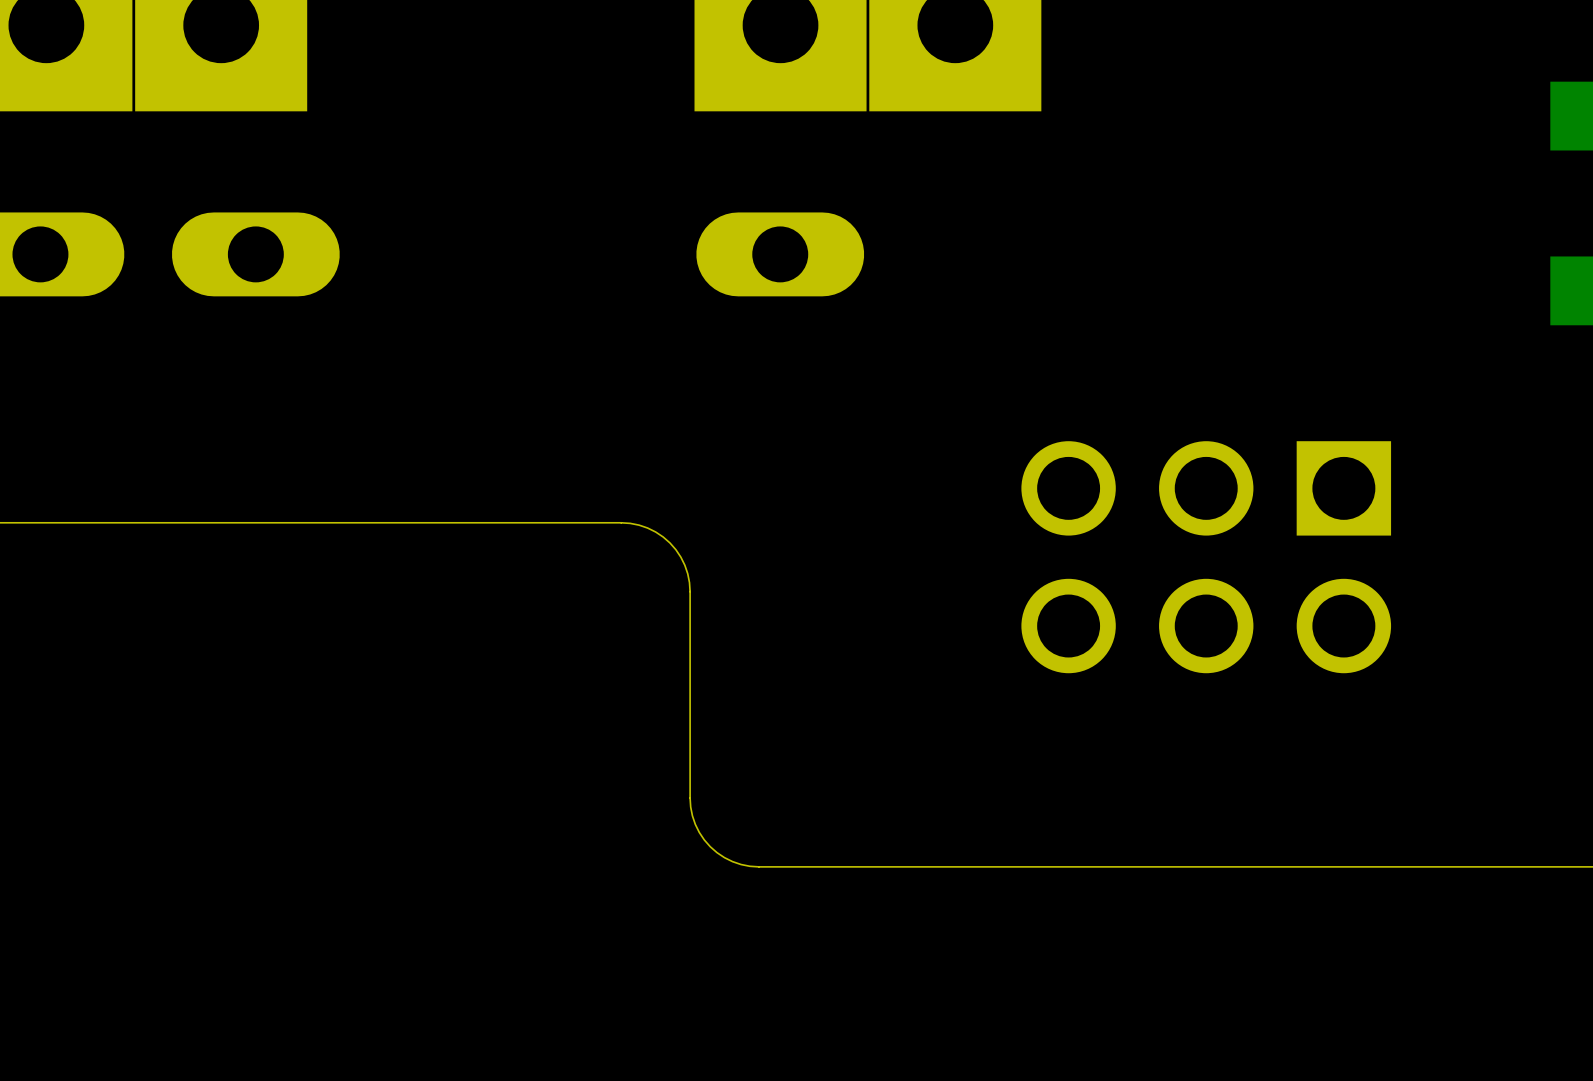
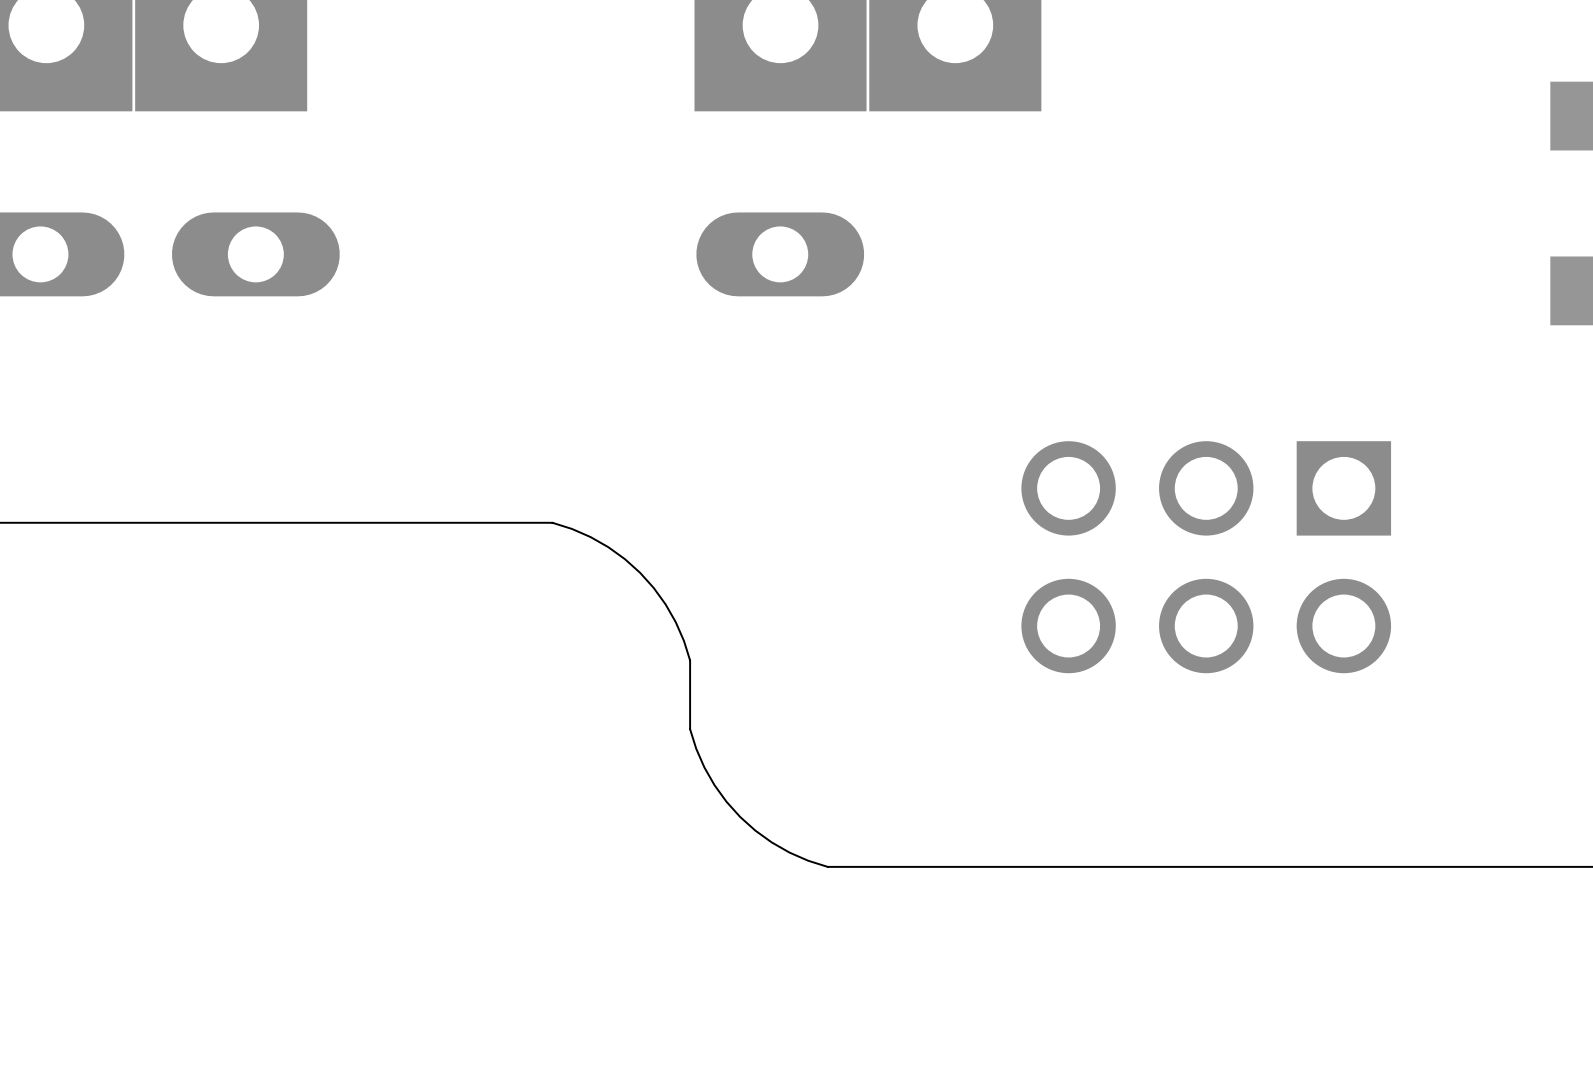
board edge: (552, 522) (630, 523) (647, 528) (669, 542) (684, 565) (689, 582) (690, 660) -> (552, 522) (590, 537) (624, 559) (640, 572) (653, 587) (675, 622) (690, 660)
board edge: (690, 729) (690, 807) (695, 824) (710, 846) (732, 861) (749, 866) (827, 866) -> (690, 729) (704, 767) (726, 801) (740, 816) (755, 830) (789, 852) (827, 866)

